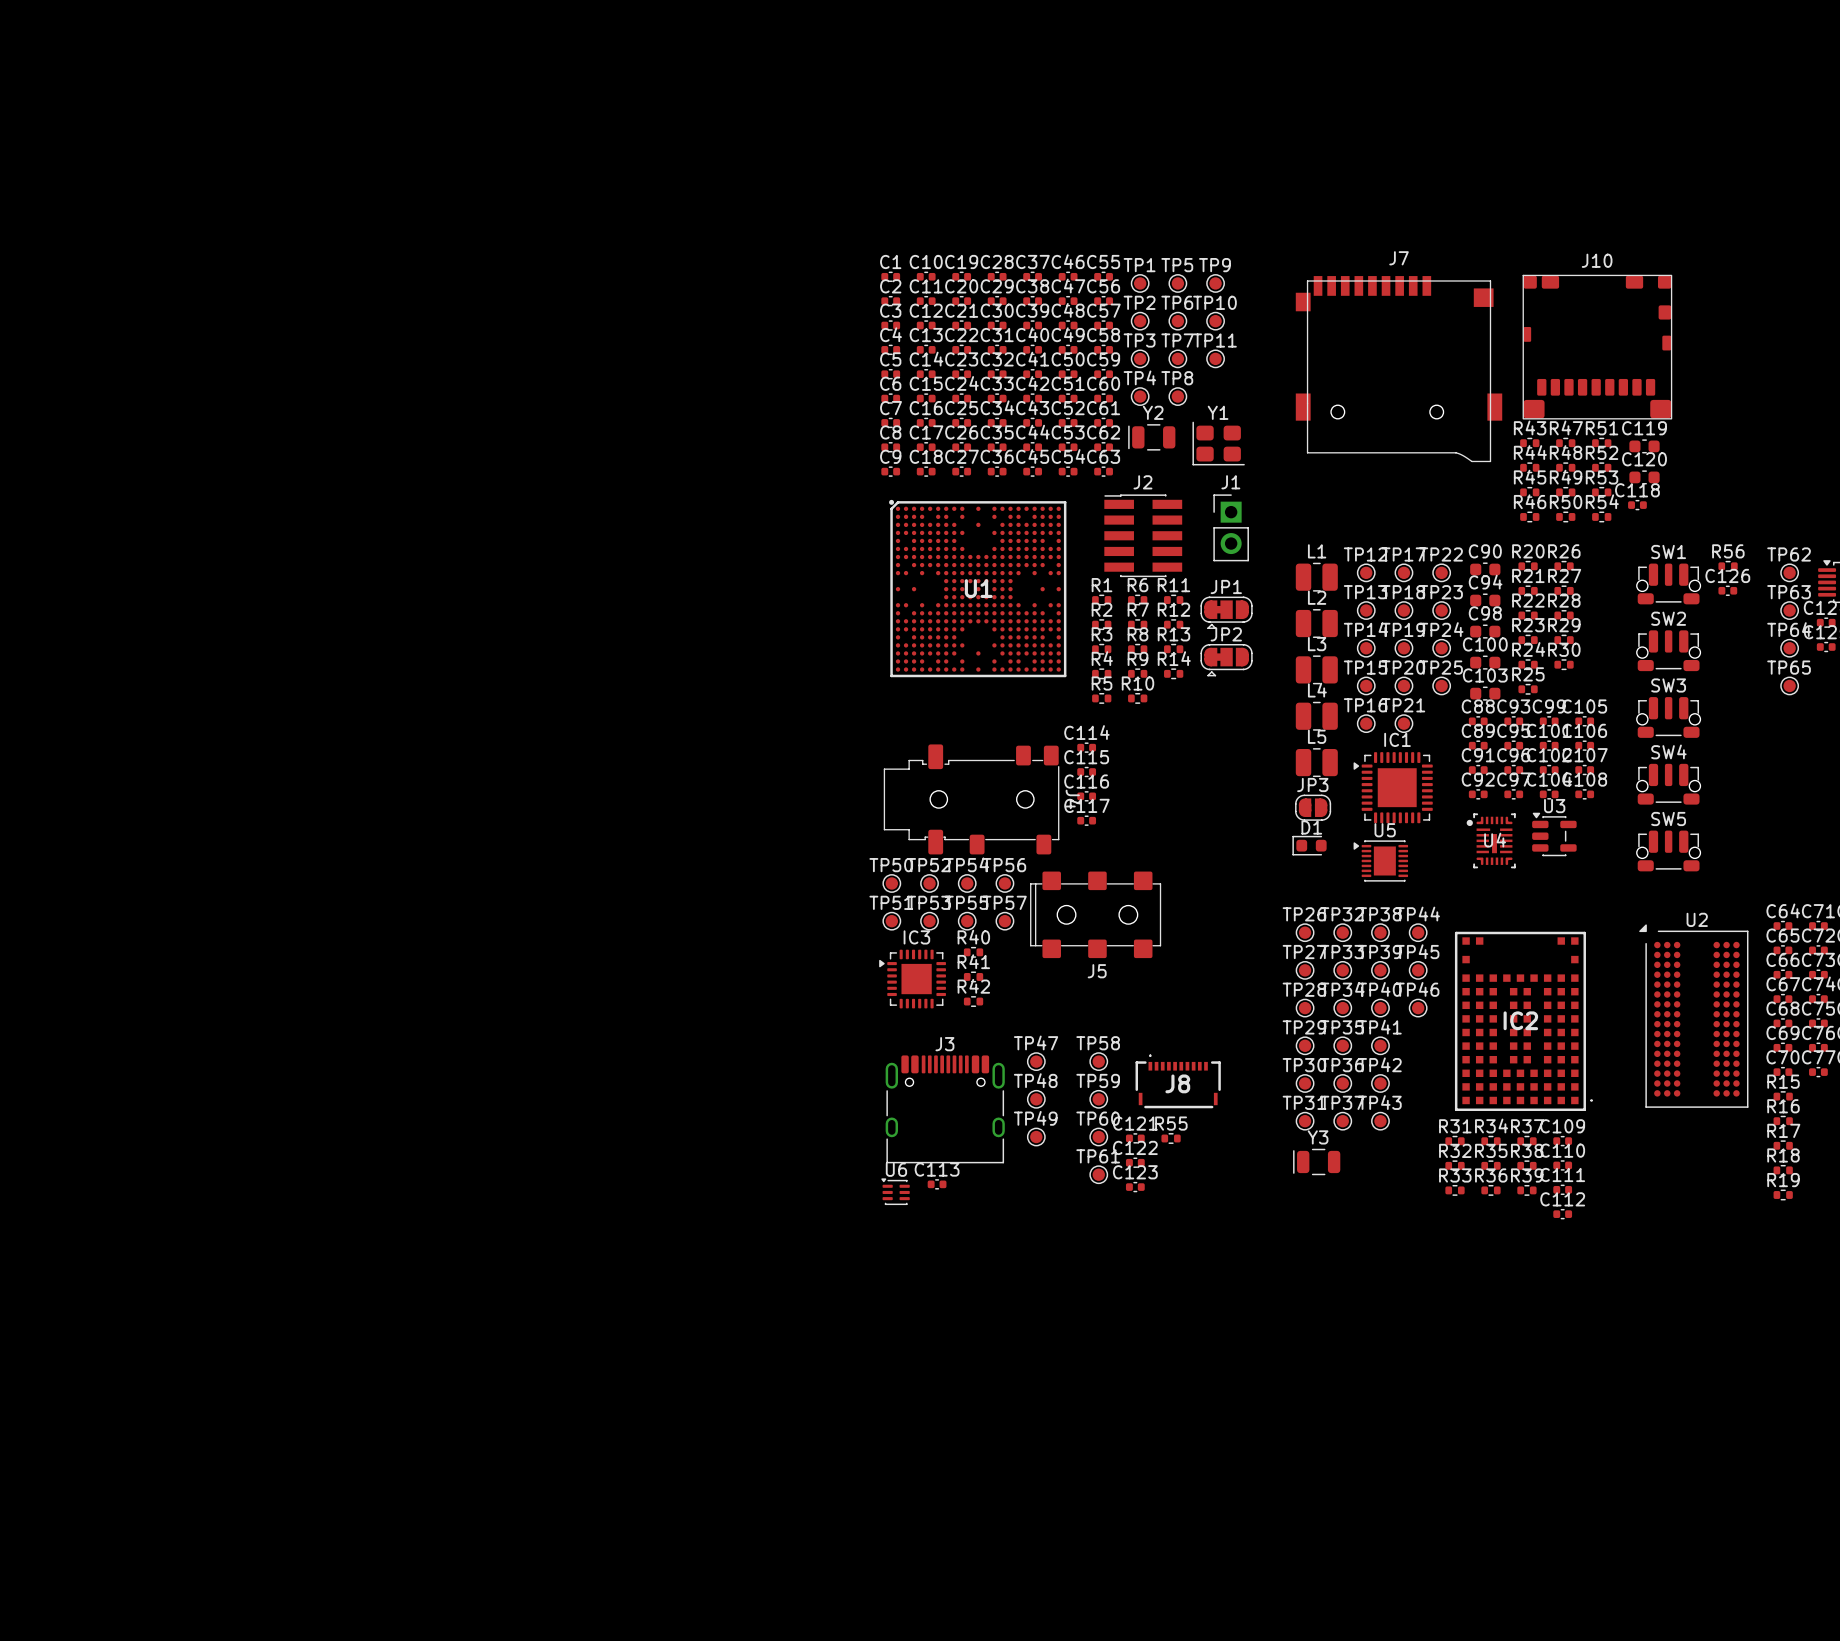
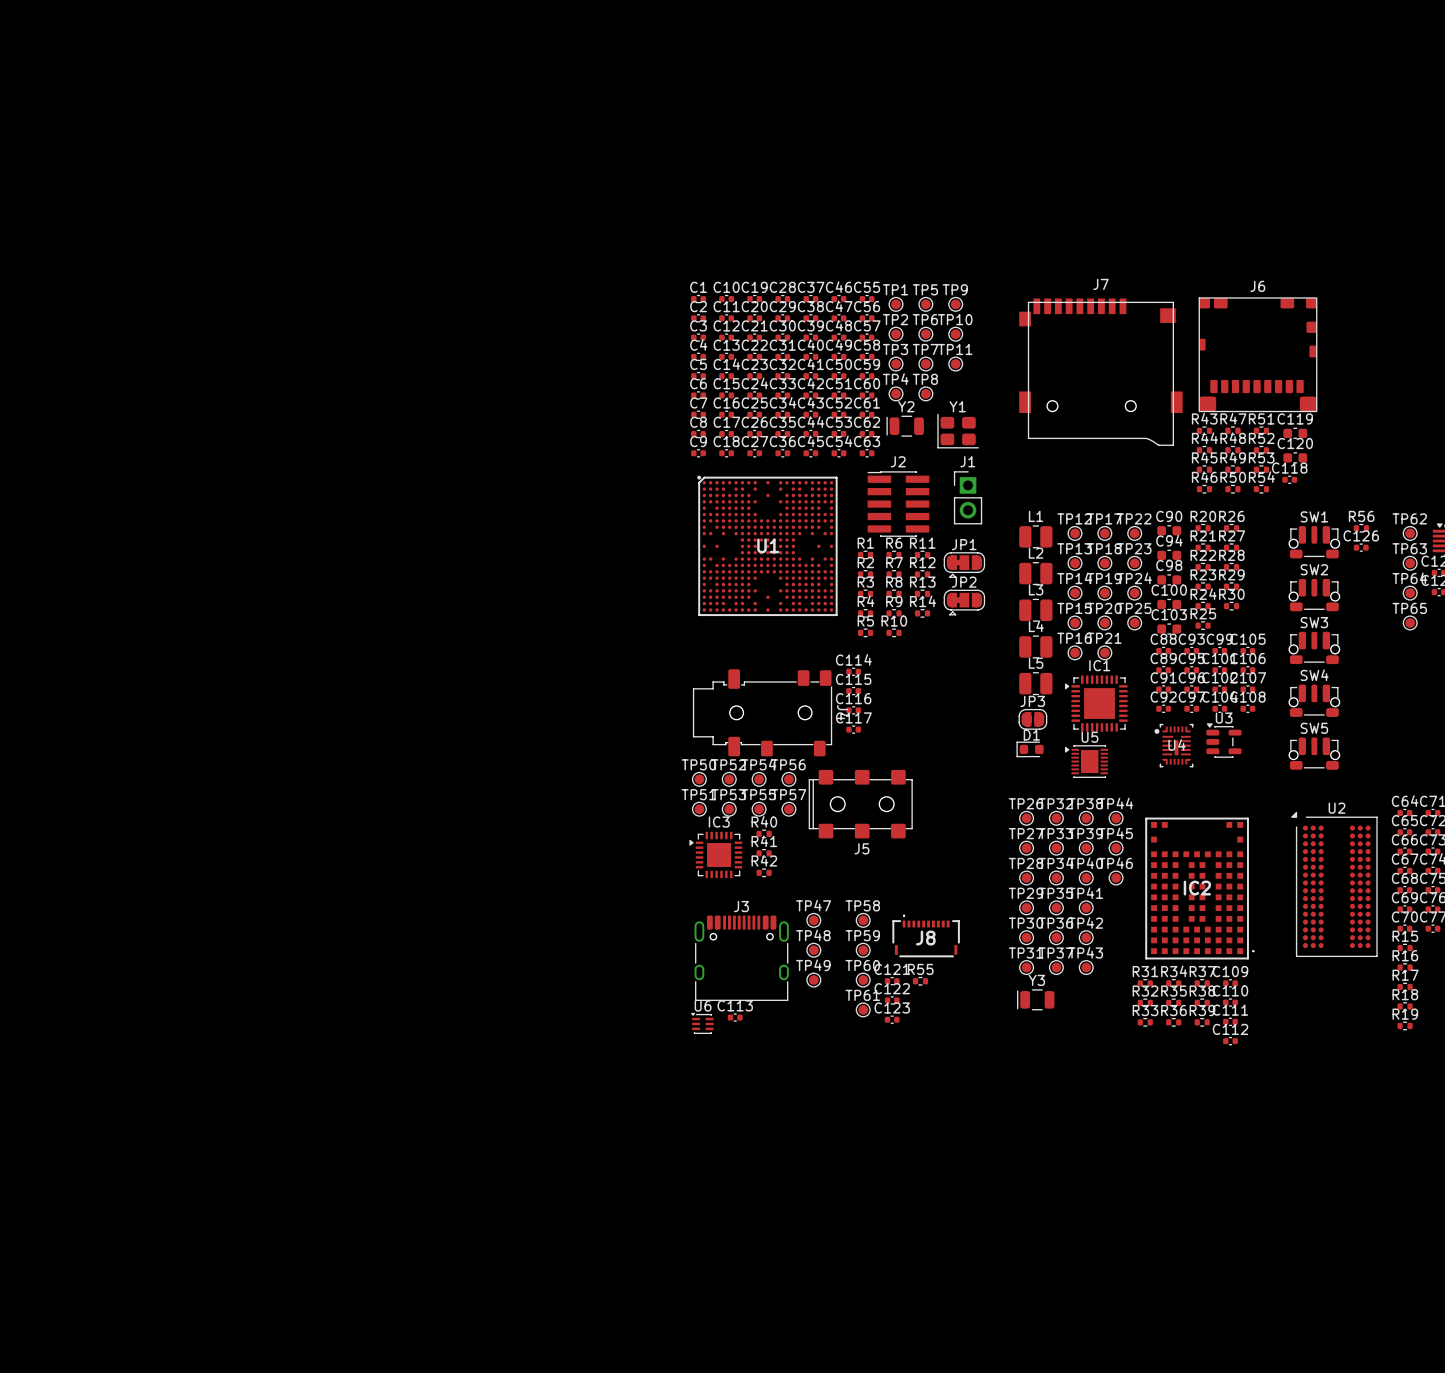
J10 name: J10 (1597, 260) -> J6 (1257, 286)

